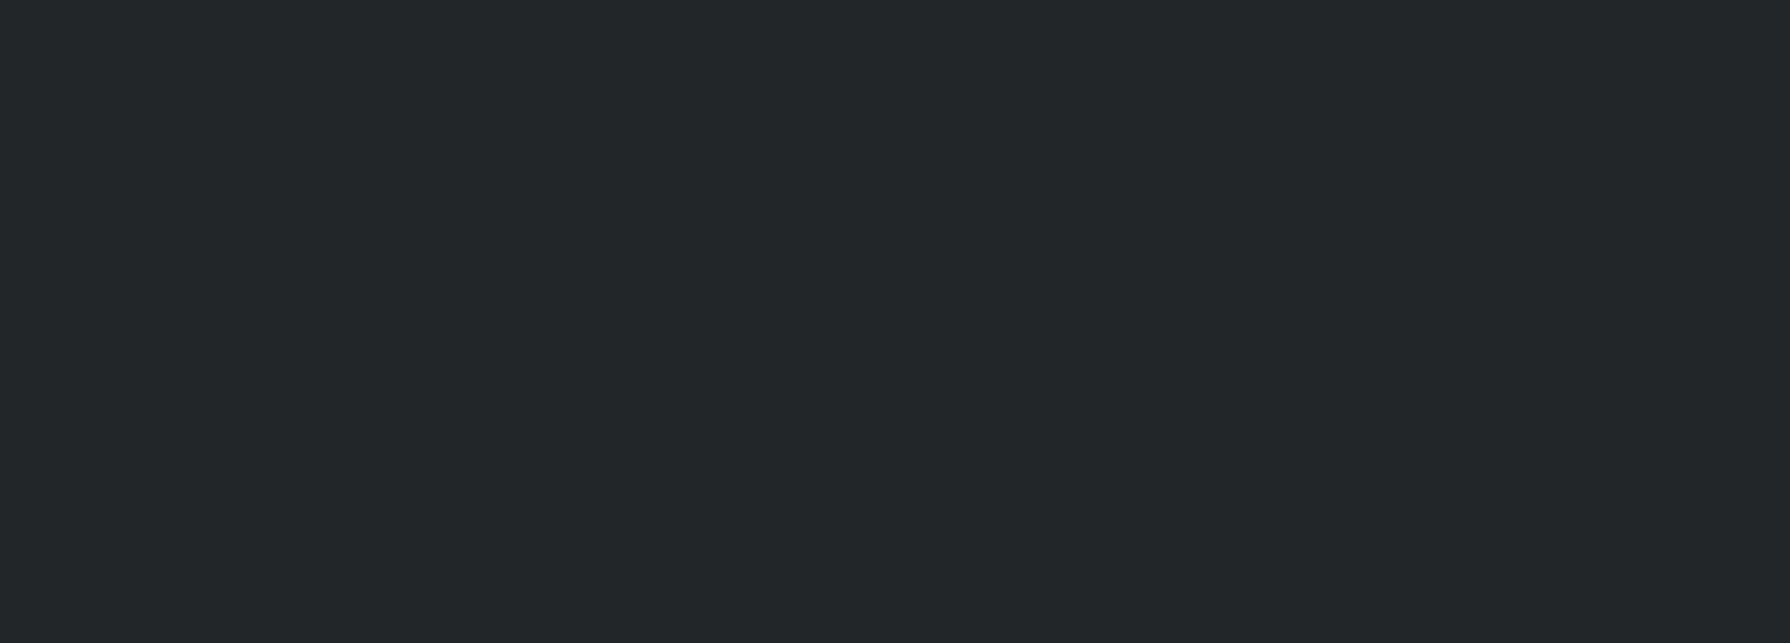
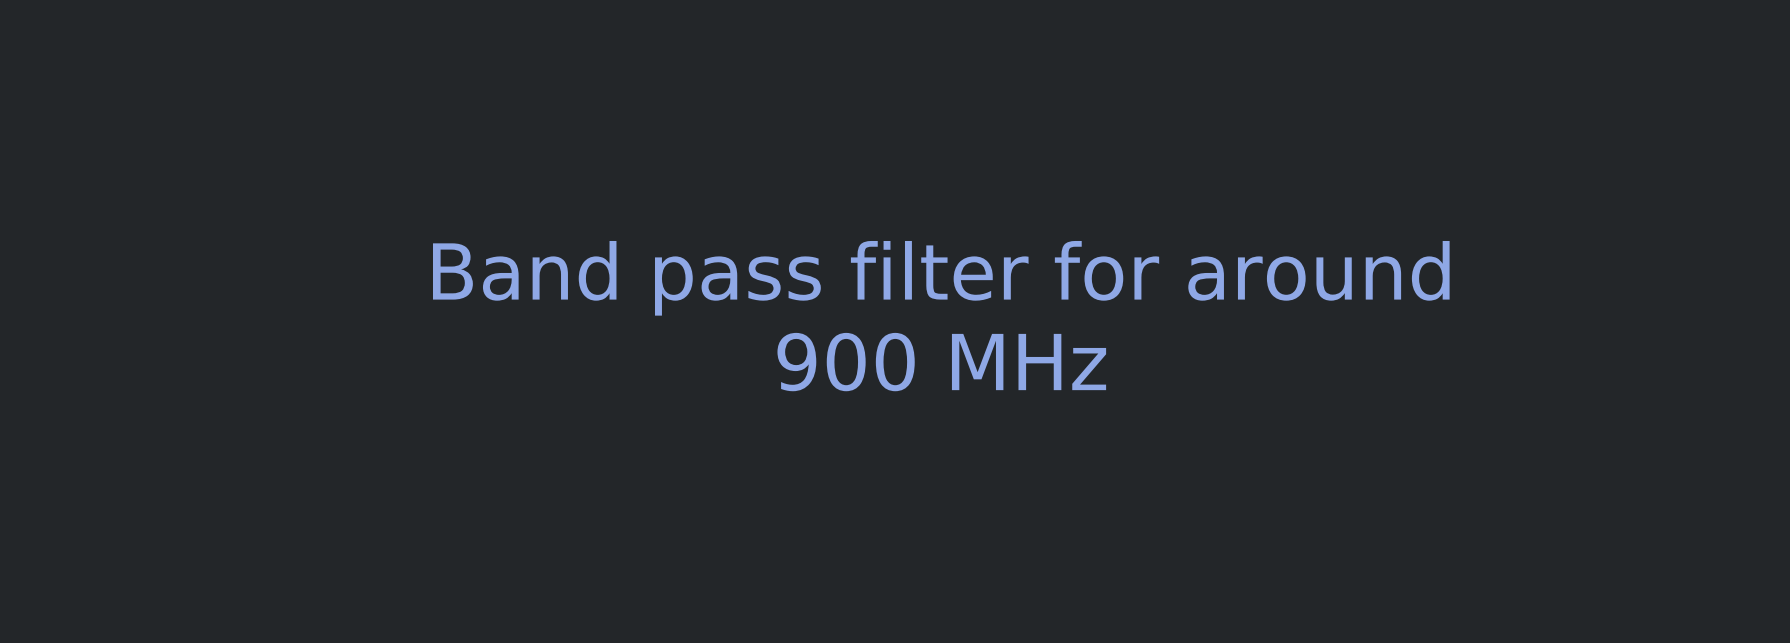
text: none -> Band pass filter for around (941, 278)
text: none -> 900 MHz (941, 362)

